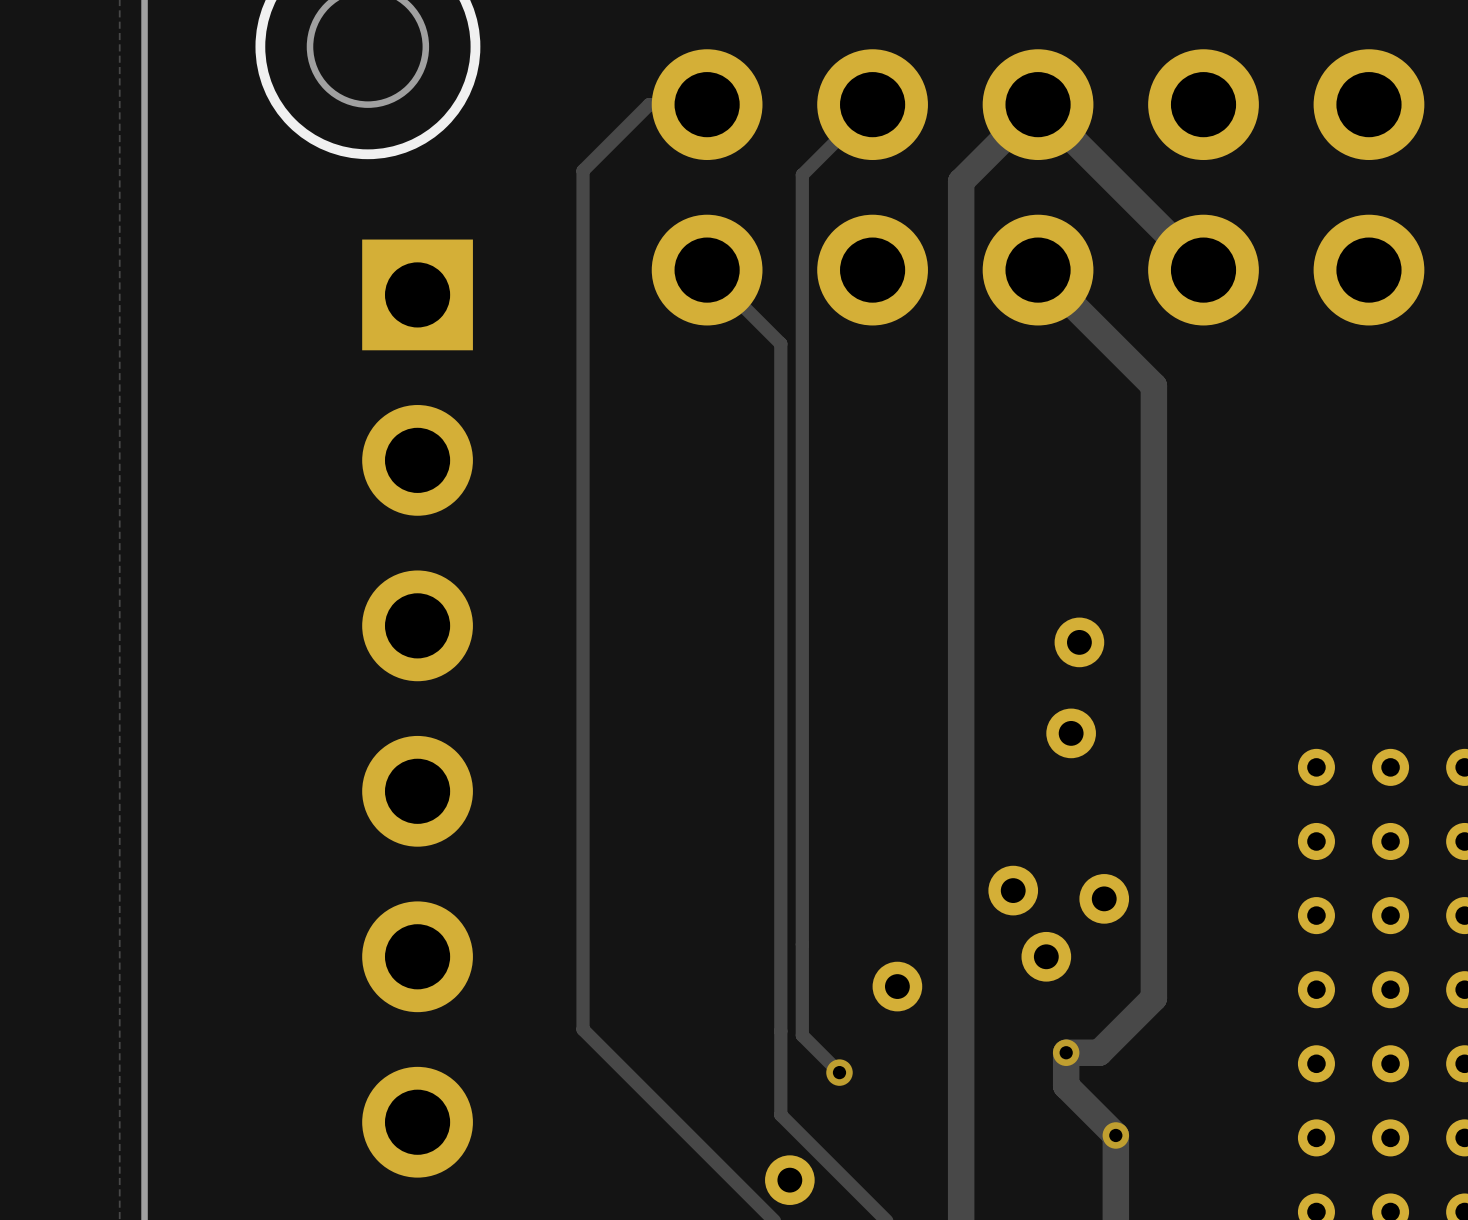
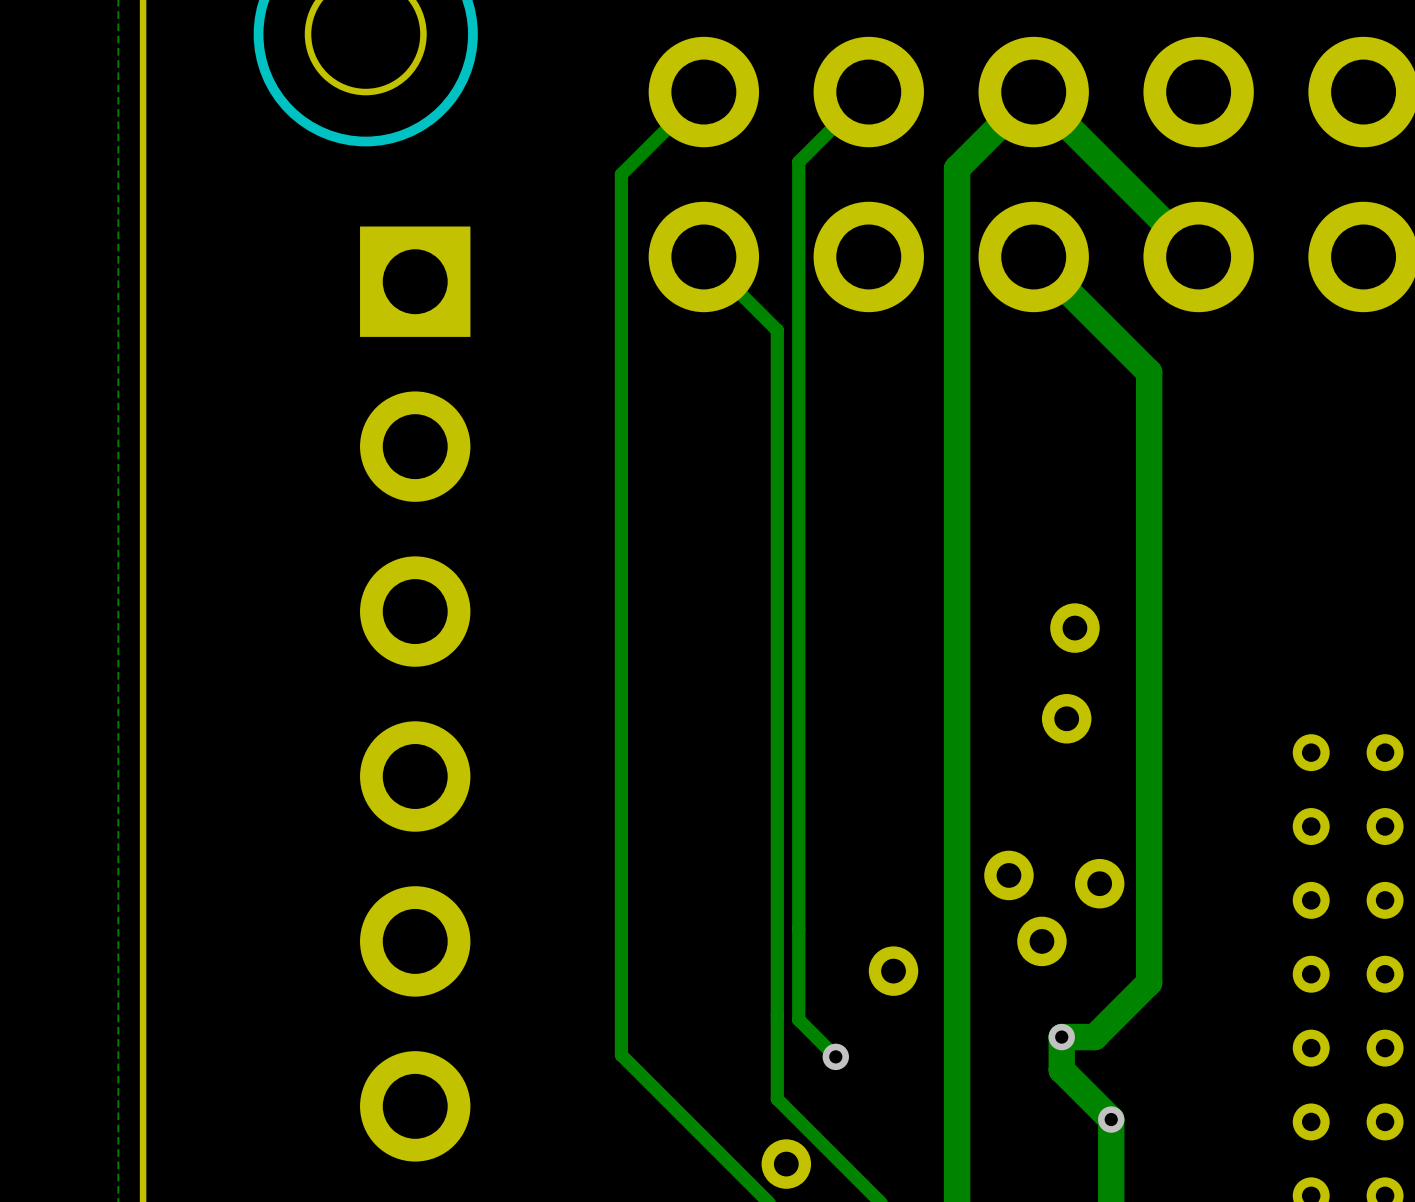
track: (707, 104) (649, 104) (583, 170) (583, 1029) (624, 1070) -> (703, 92) (621, 174) (621, 1055)

